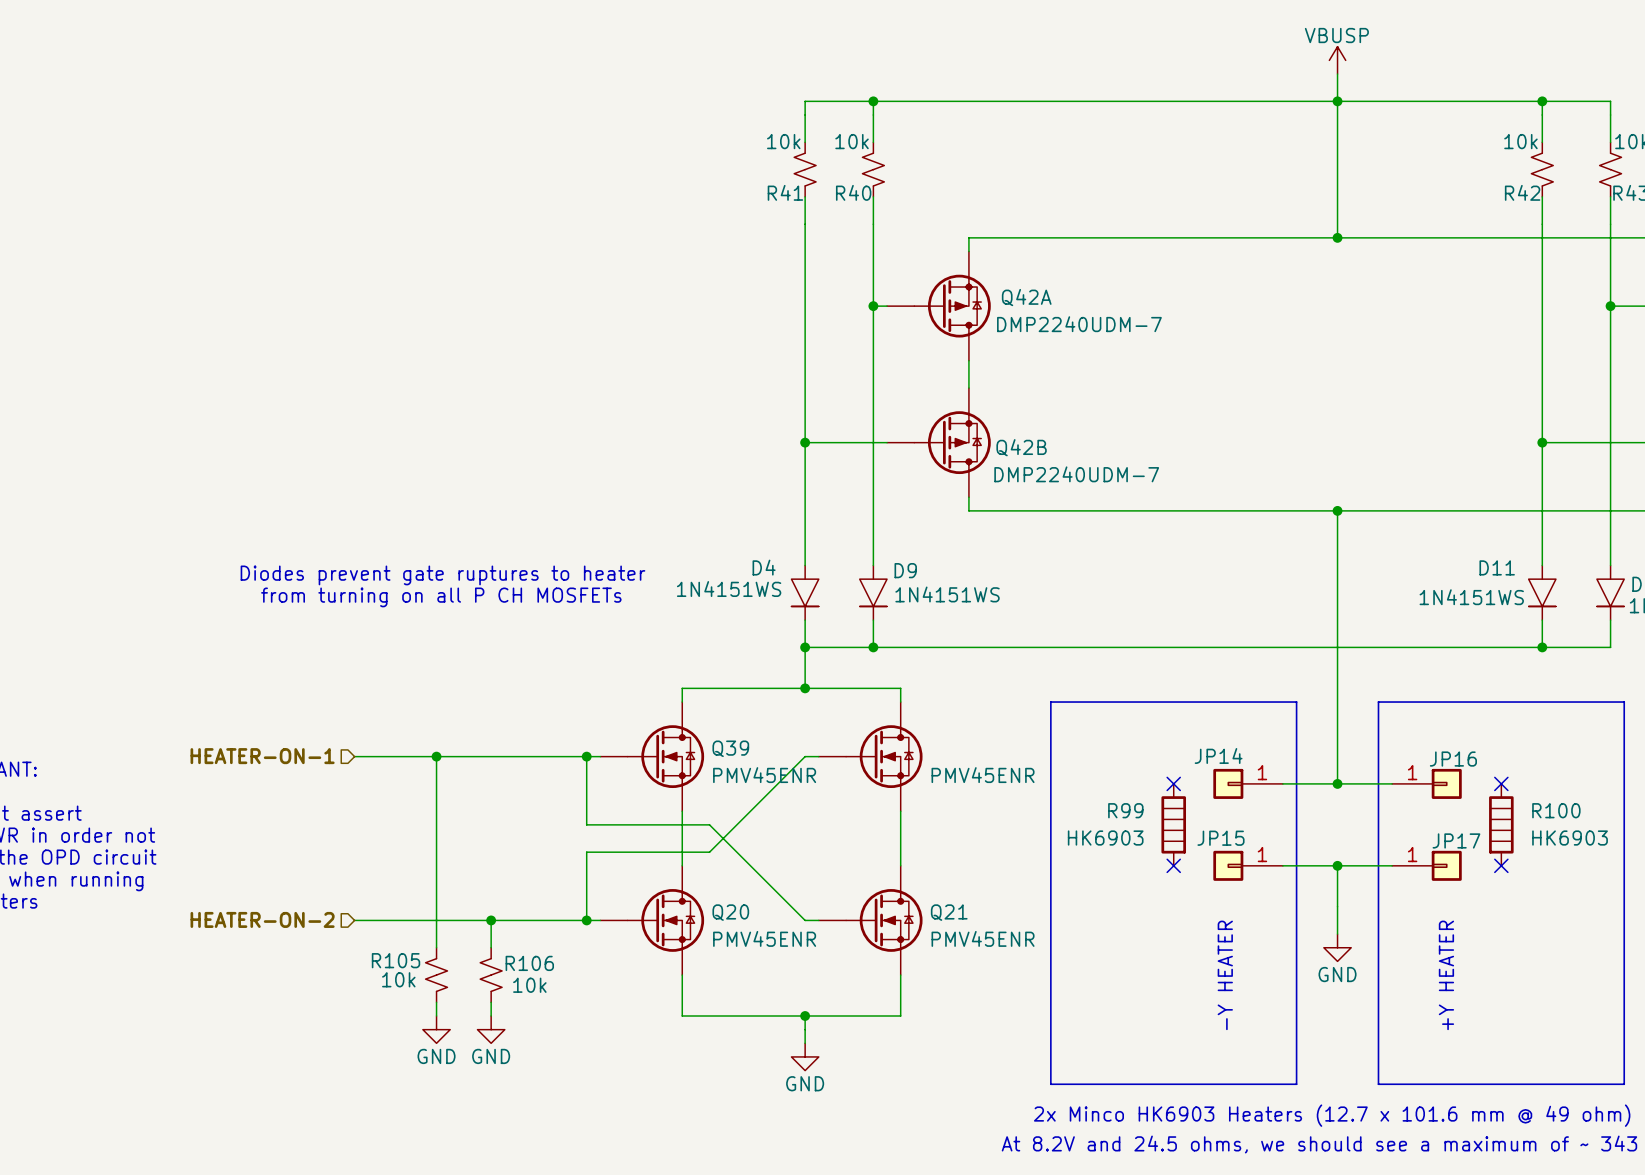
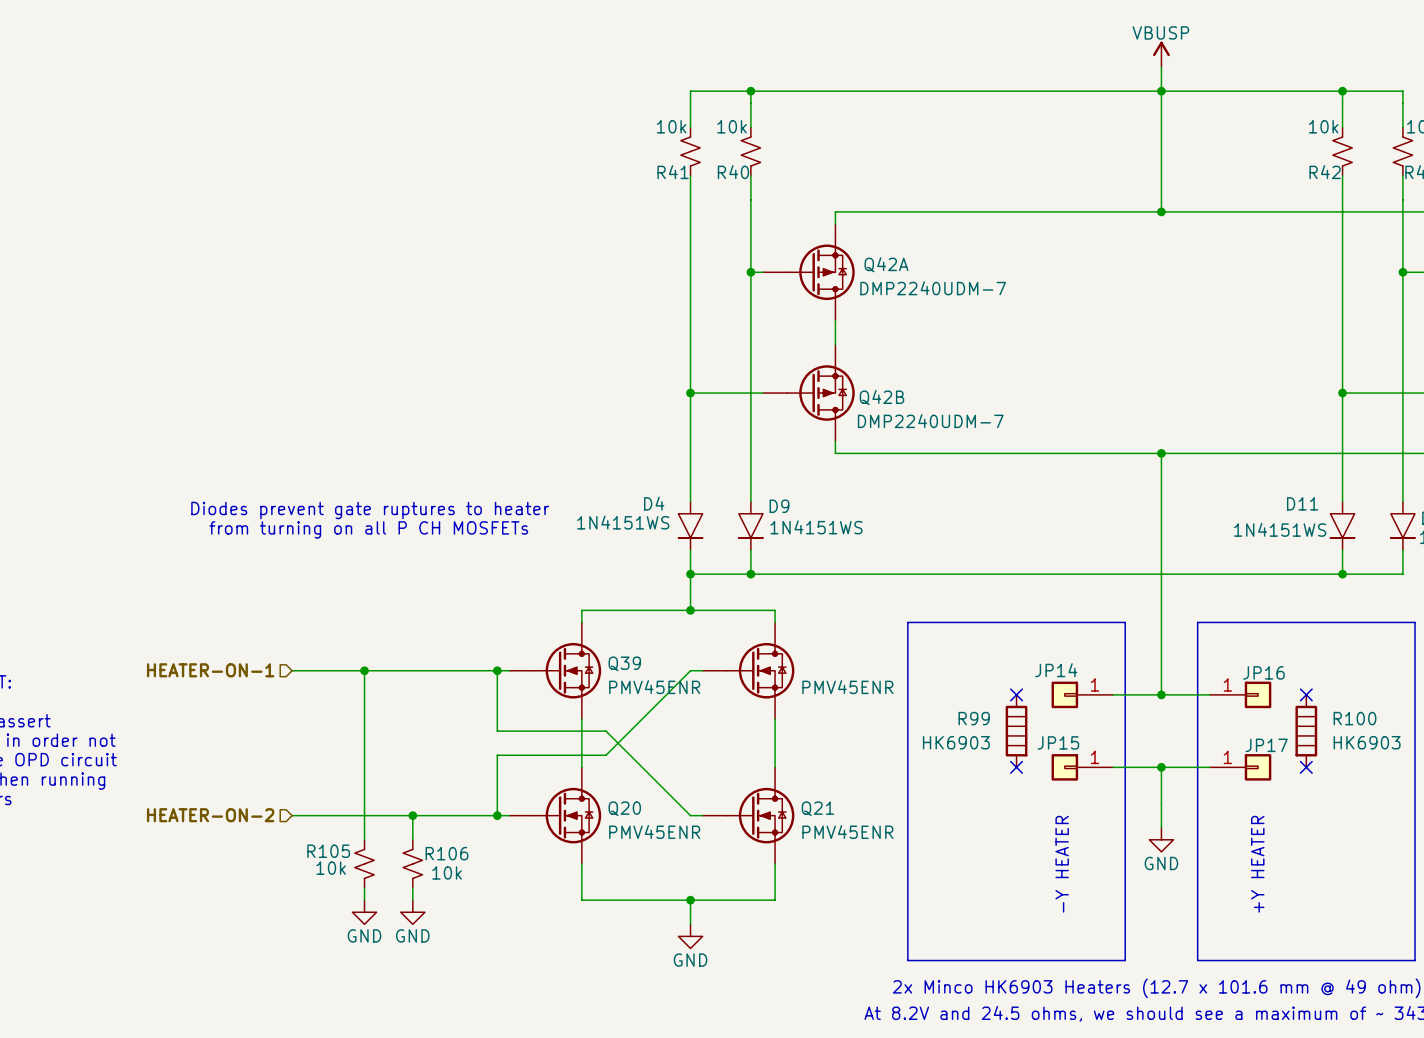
power symbol shape: [1329, 46, 1346, 75] -> [1152, 41, 1170, 68]

